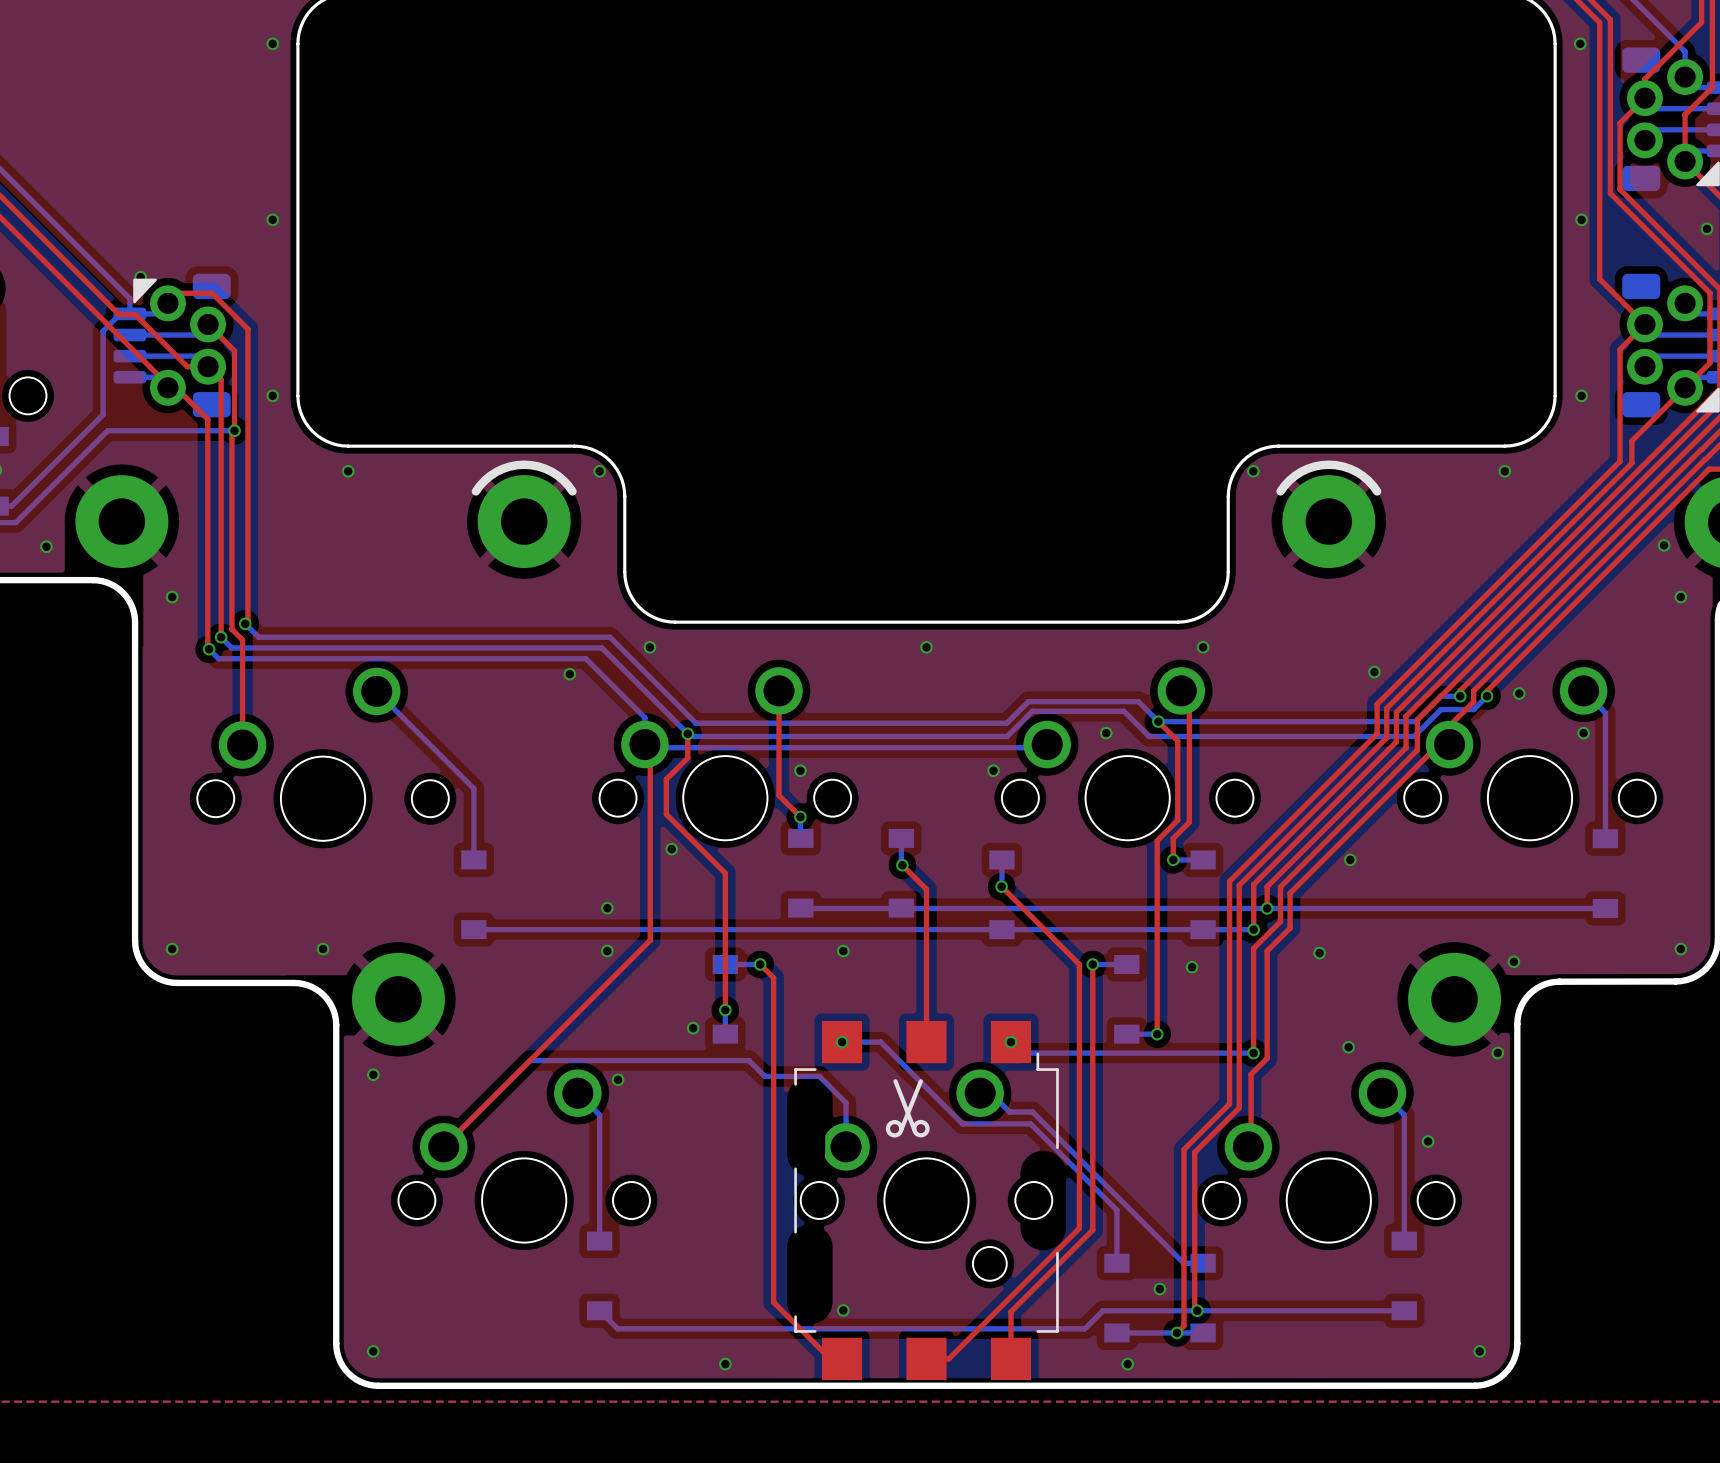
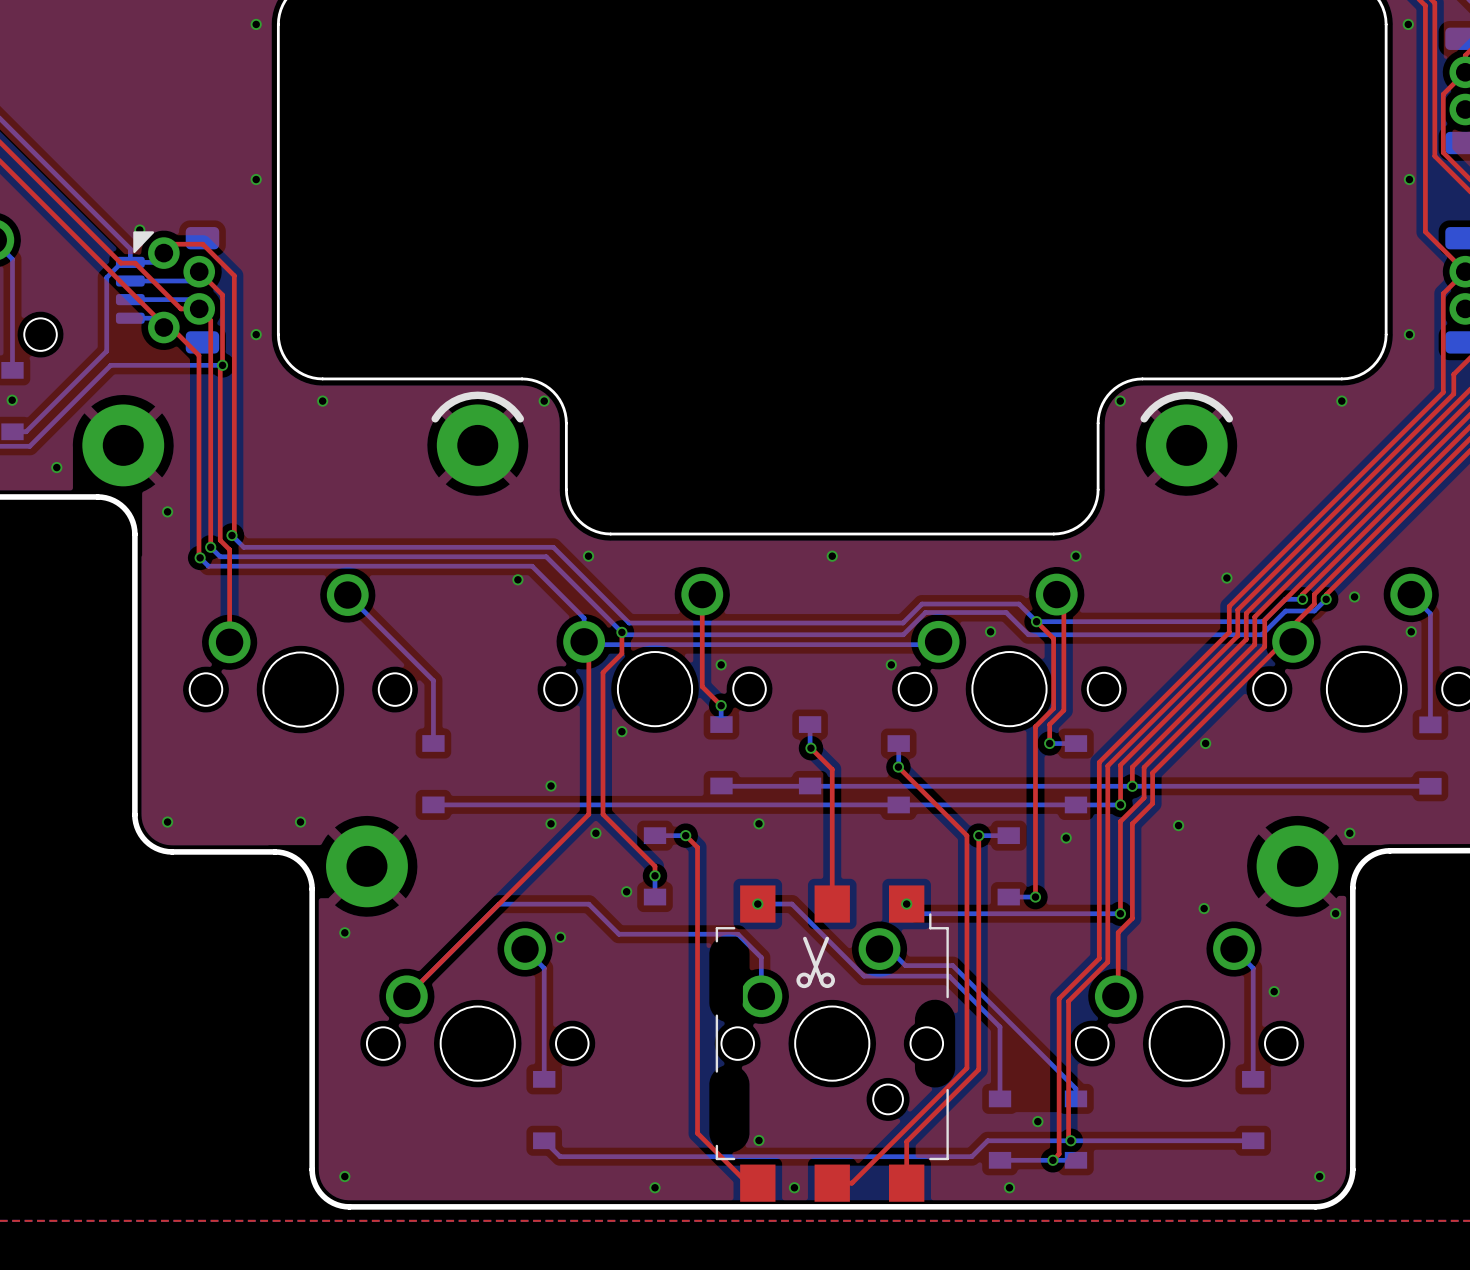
top track: (666, 814) (725, 873) (725, 999) -> (603, 703) (603, 814) (655, 866)
via position: (671, 849) -> (621, 731)
via: none -> (595, 833)
bottom track: (530, 1060) (749, 1060) (764, 1076) -> (482, 920) (499, 904) (588, 904) (618, 934) (689, 934)
bottom track: (1032, 1111) (1183, 1263) (1203, 1263) -> (925, 965) (952, 965) (1075, 1088) (1075, 1098)
bottom track: (1030, 1123) (1116, 1210) -> (924, 976) (949, 976) (1000, 1027) (1000, 1052)
via: none -> (794, 1187)

